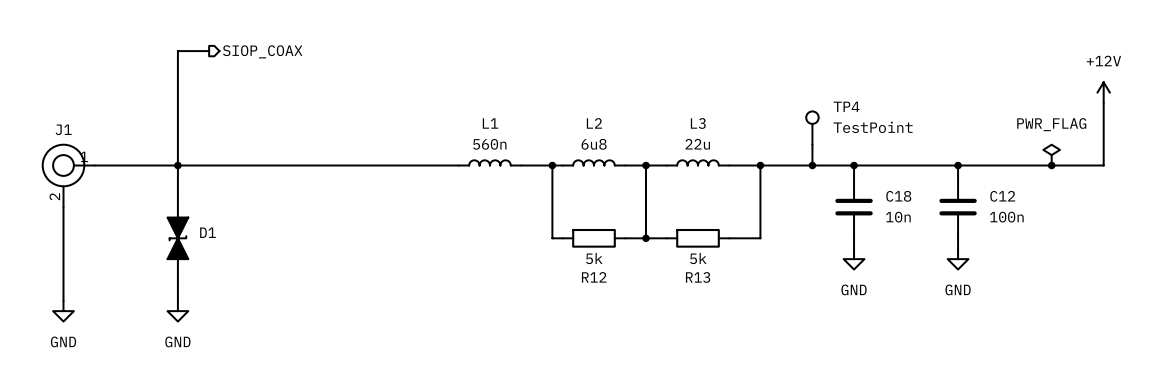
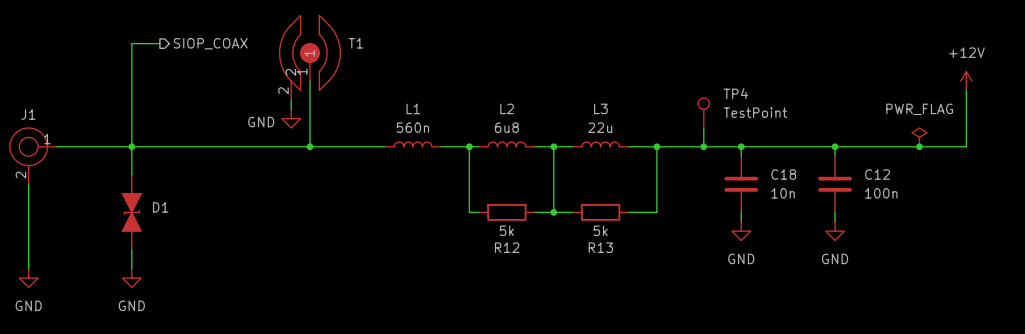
T1: none -> (309, 57)
wire: none -> (309, 81) (309, 146)
wire: none -> (291, 99) (291, 109)
power symbol: none -> GND (291, 118)
junction: none -> (309, 146)

